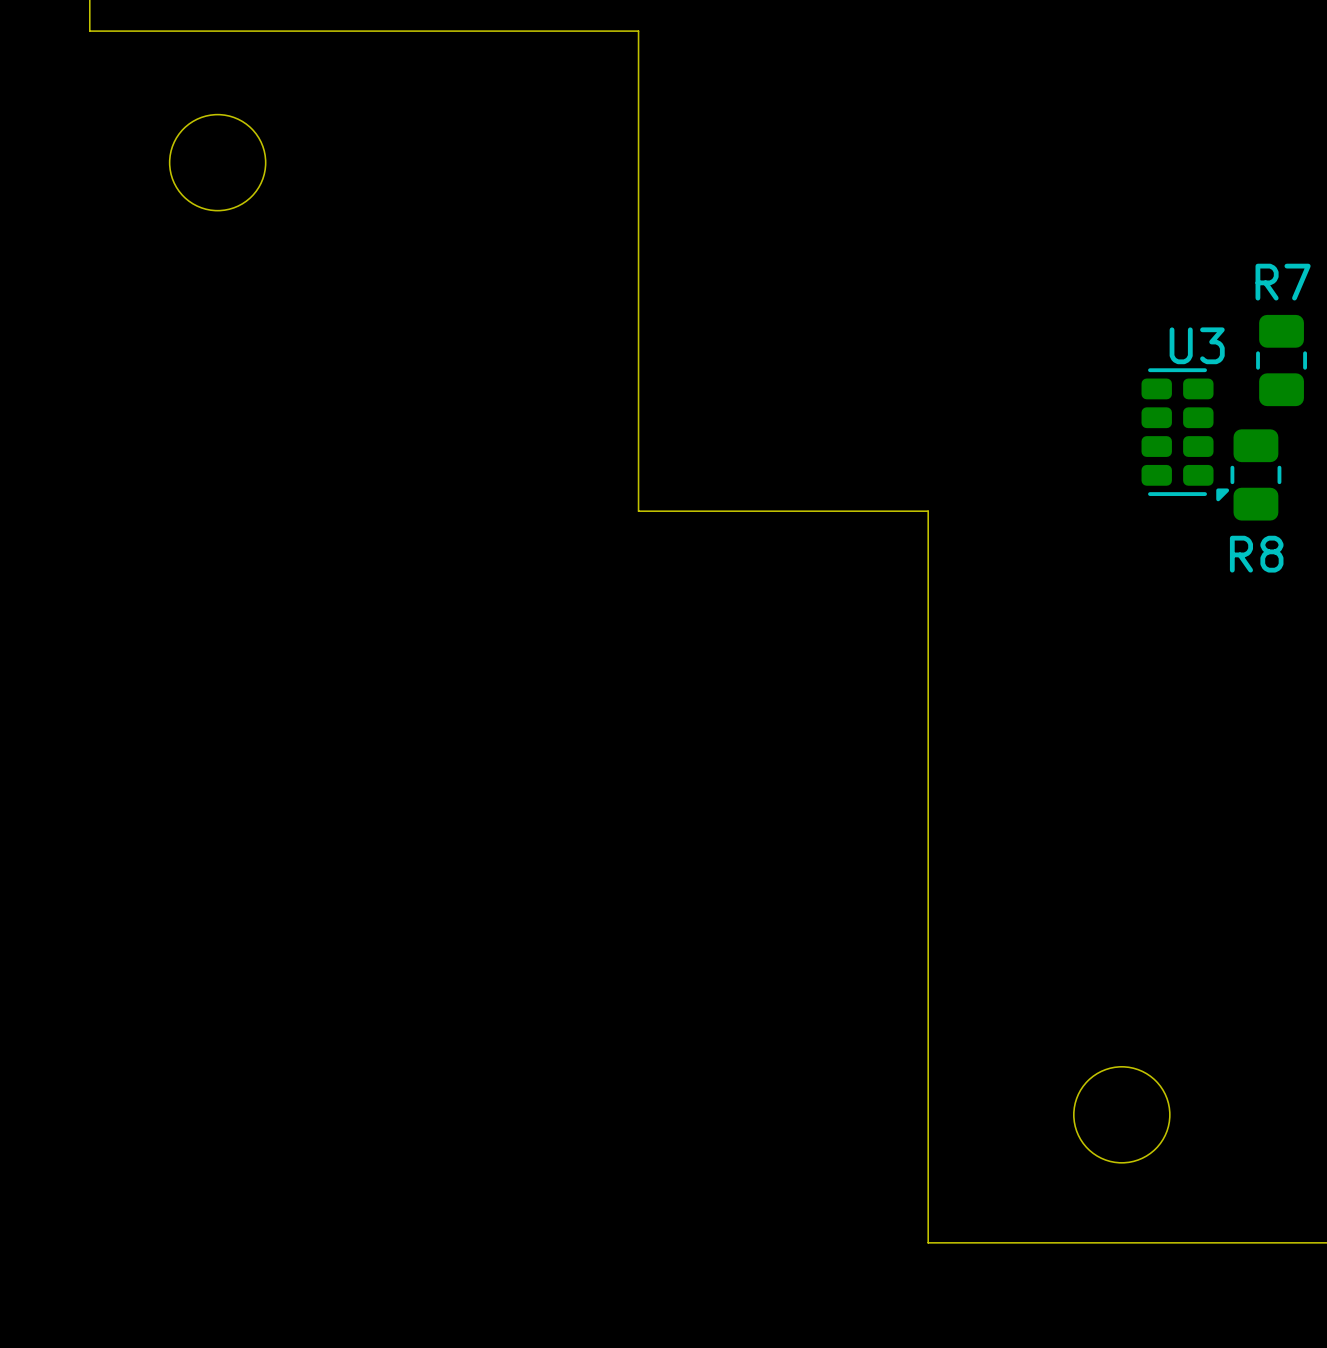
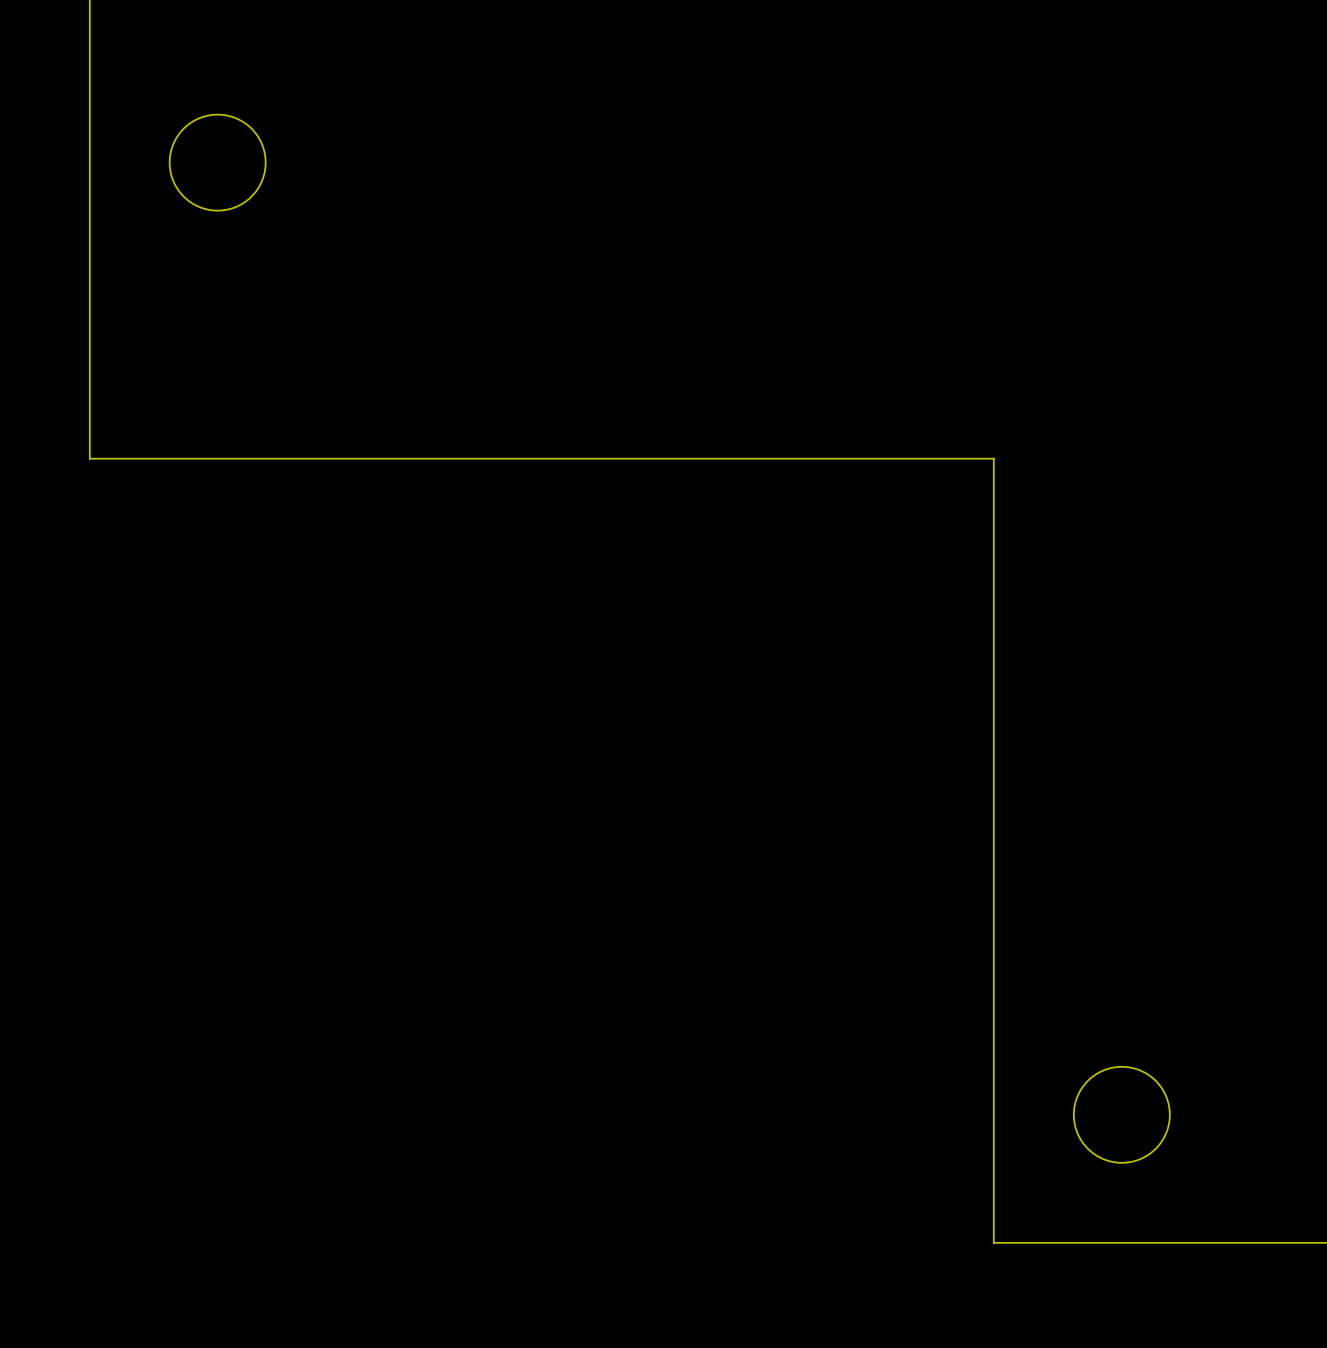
board edge: (89, 31) (638, 31) (638, 511) (928, 511) (928, 1242) (993, 1242) -> (89, 31) (89, 458) (993, 458) (993, 1242)
R7: (1281, 360) -> none
U3: (1185, 434) -> none
R8: (1255, 474) -> none

